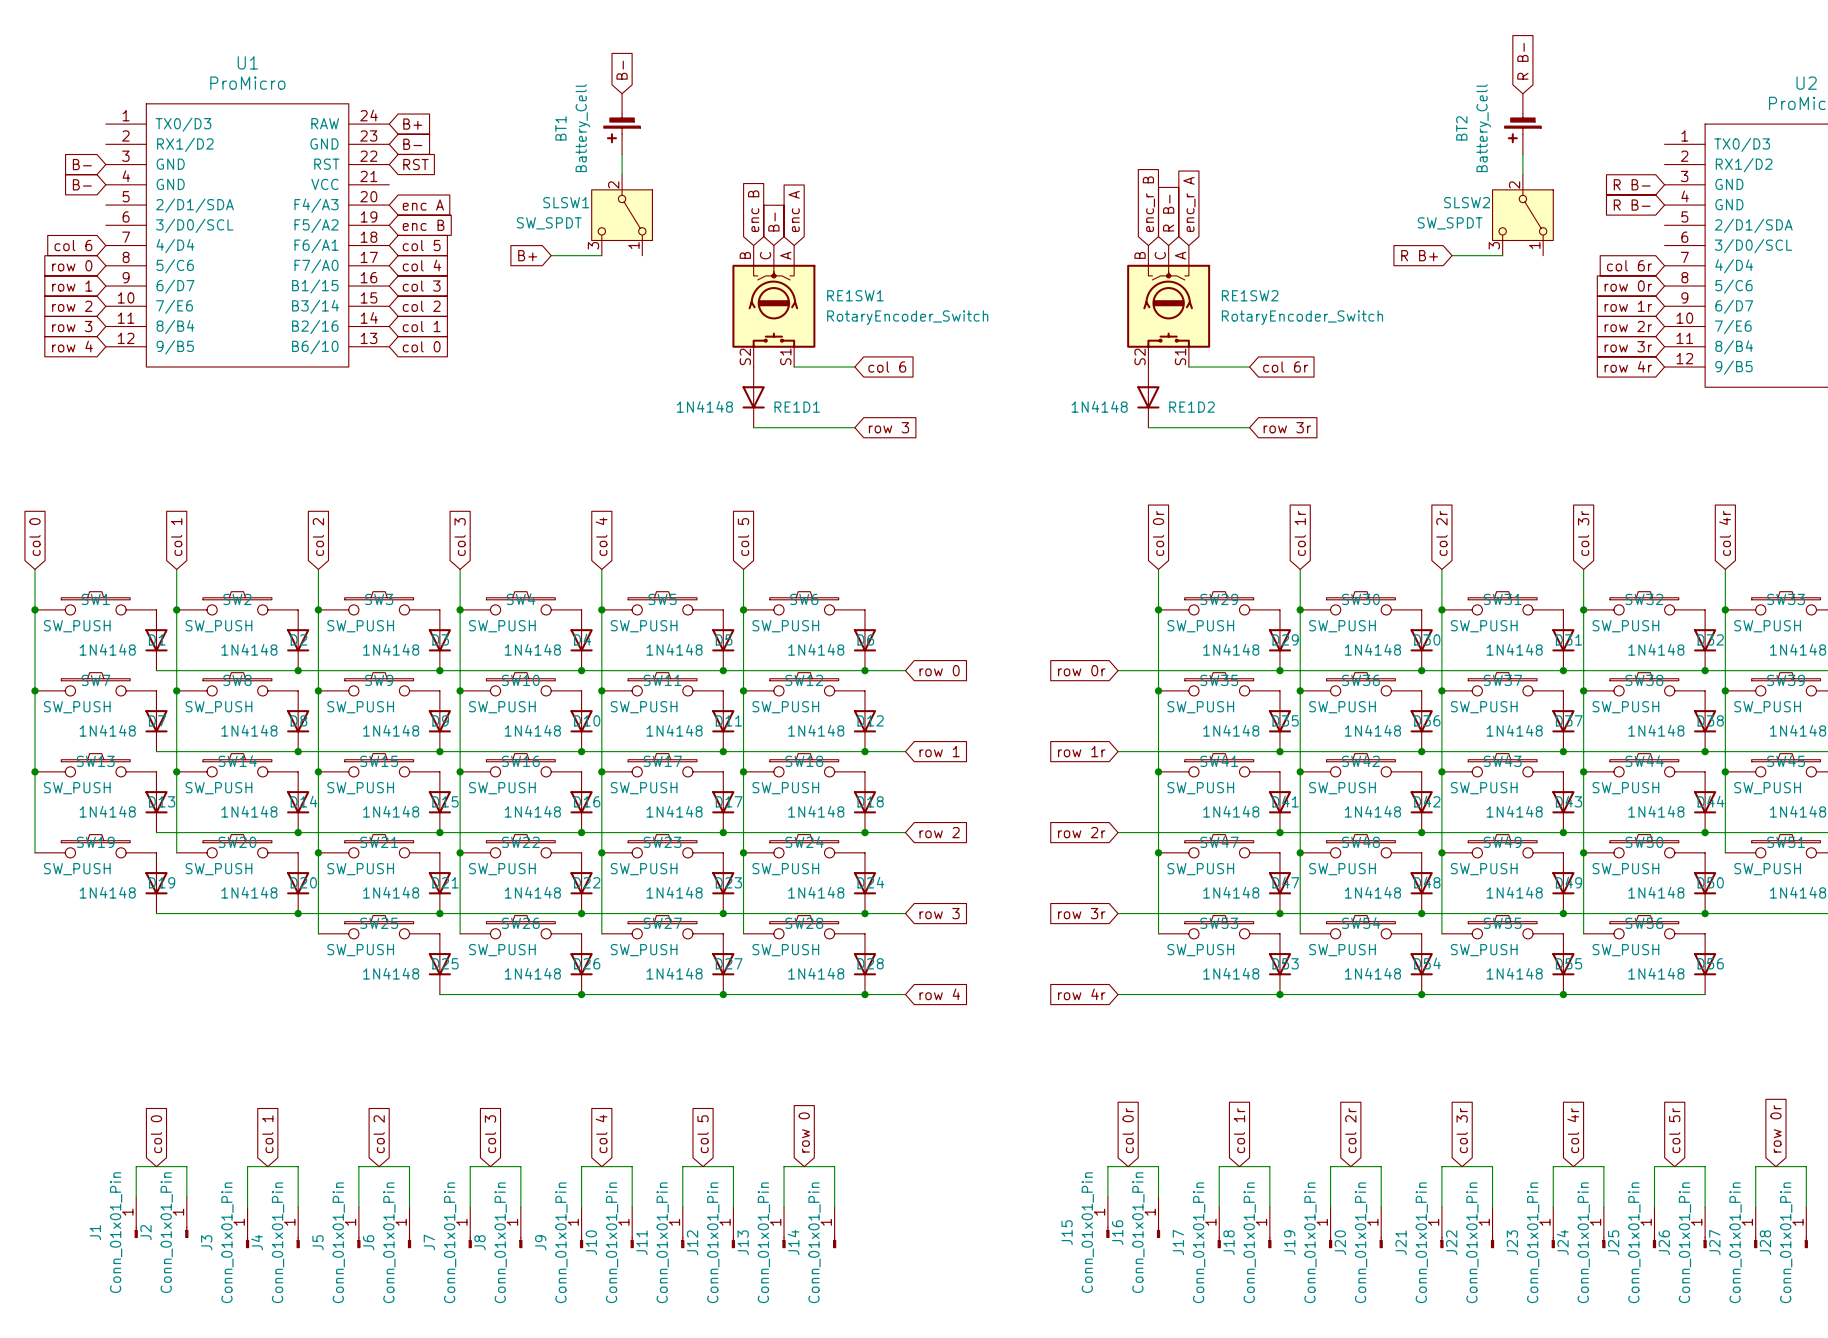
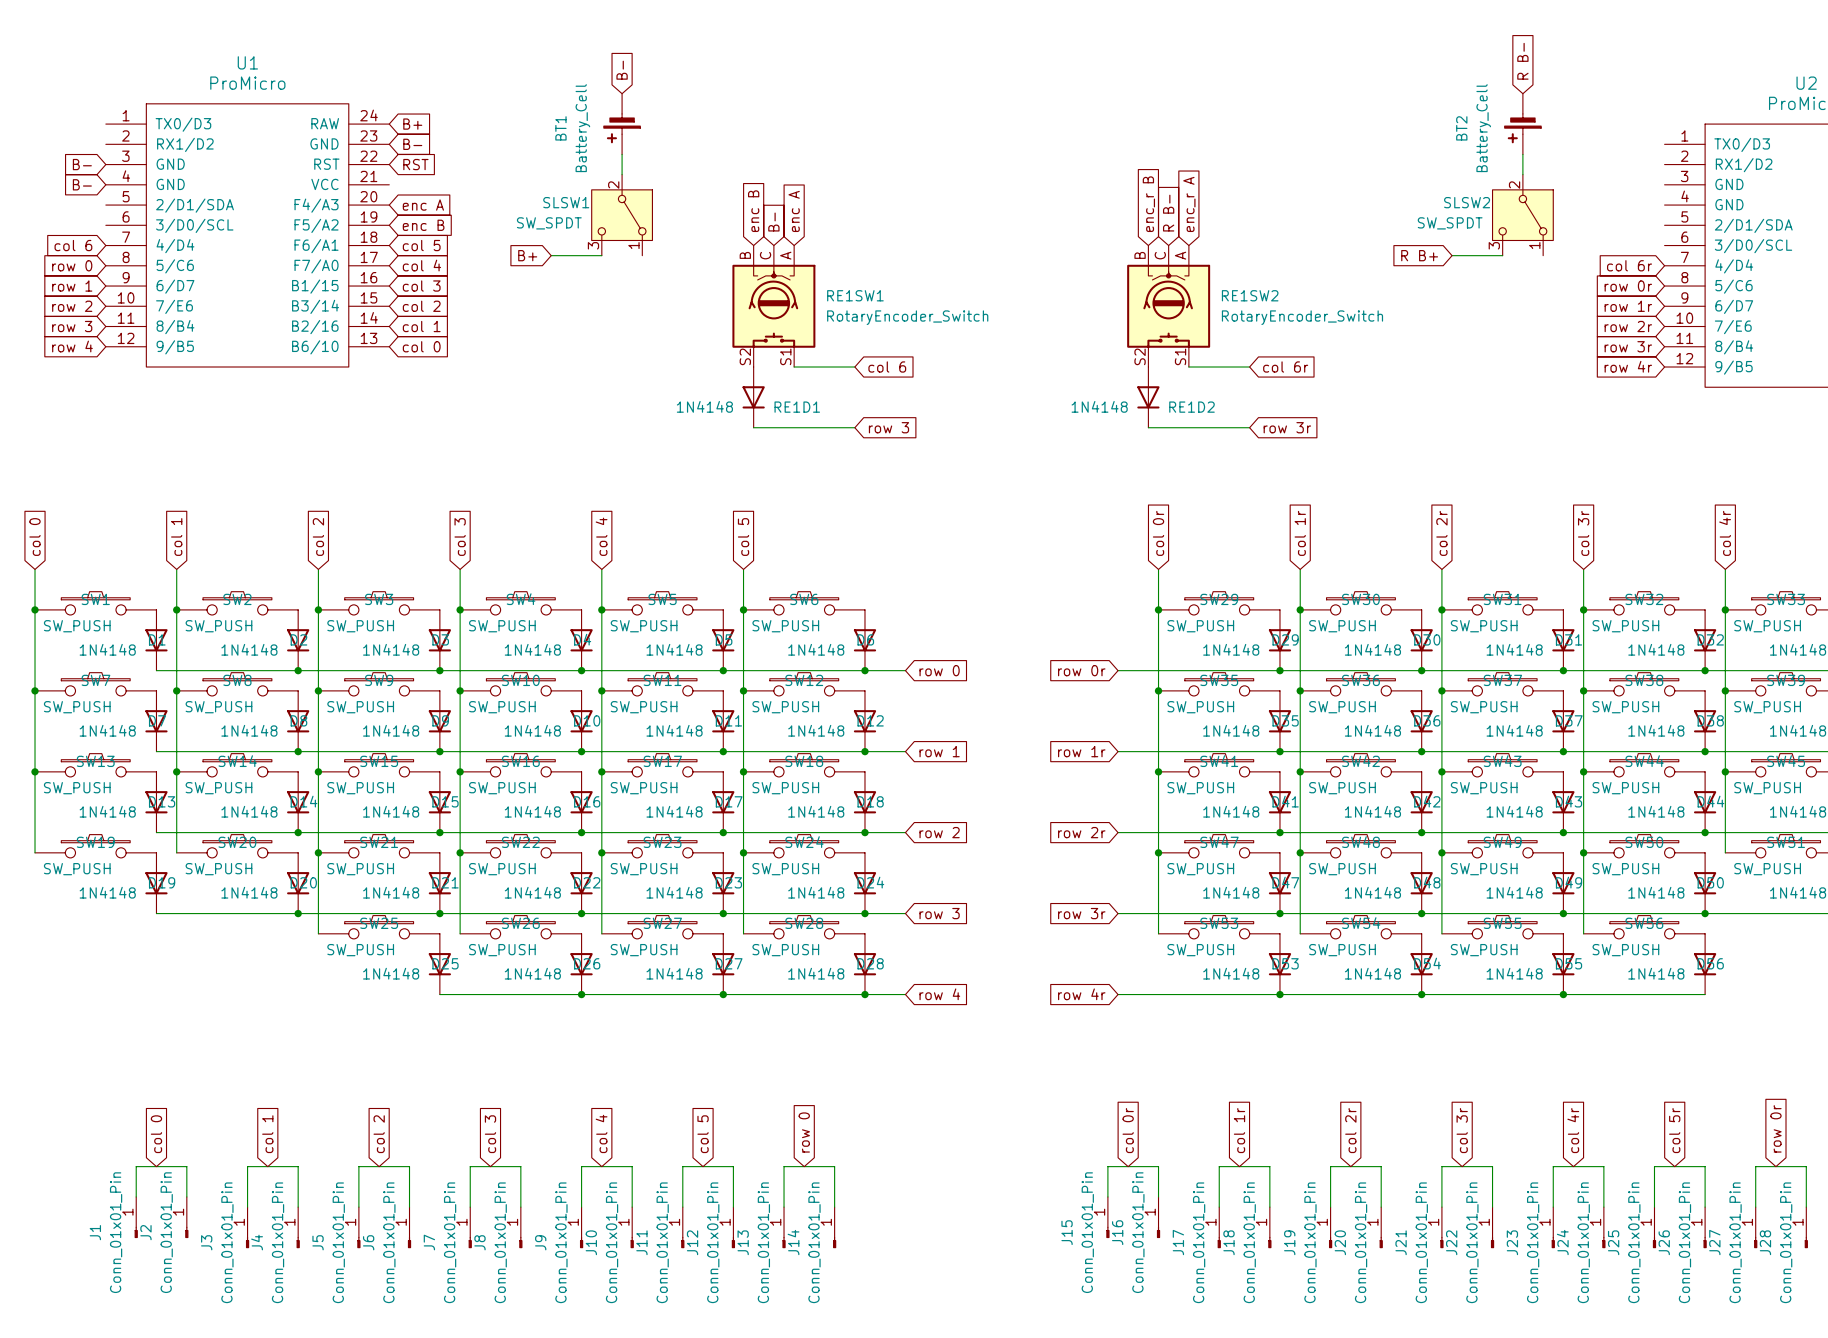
global label: R B- (1632, 184) -> none
global label: R B- (1632, 205) -> none

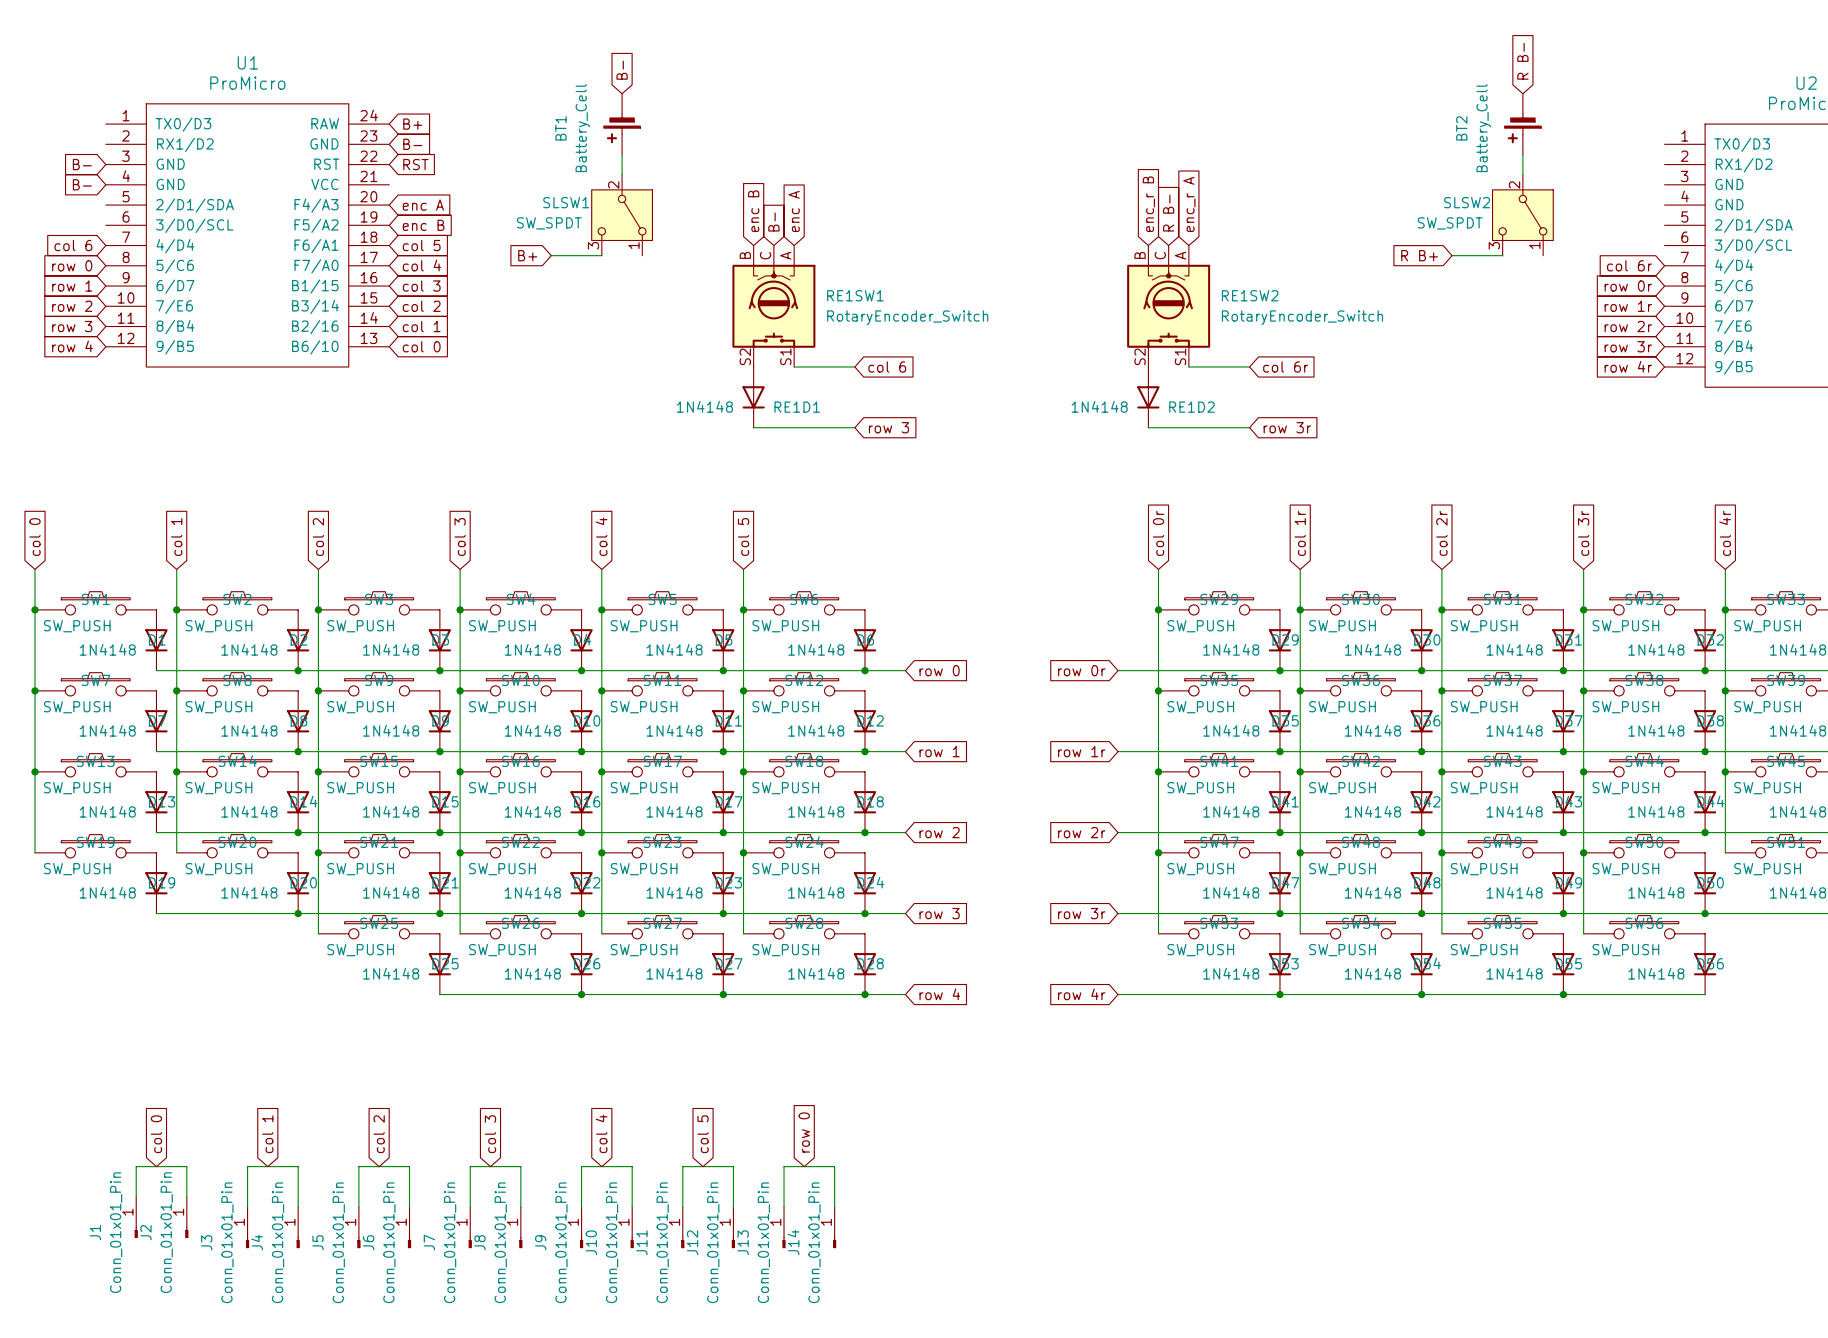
global label: row 0r (1775, 1128) -> none
global label: col 0r (1128, 1130) -> none
global label: col 1r (1239, 1130) -> none
global label: col 2r (1350, 1130) -> none
global label: col 3r (1462, 1130) -> none
global label: col 4r (1573, 1130) -> none
global label: col 5r (1674, 1130) -> none
wire: (1107, 1196) (1107, 1166) (1158, 1166) (1158, 1196) -> none
wire: (1219, 1207) (1219, 1166) (1269, 1166) (1269, 1207) -> none
wire: (1330, 1207) (1330, 1166) (1381, 1166) (1381, 1207) -> none
wire: (1441, 1207) (1441, 1166) (1492, 1166) (1492, 1207) -> none
wire: (1553, 1207) (1553, 1166) (1603, 1166) (1603, 1207) -> none
wire: (1654, 1207) (1654, 1166) (1705, 1166) (1705, 1207) -> none
wire: (1755, 1207) (1755, 1166) (1806, 1166) (1806, 1207) -> none
J15: Conn_01x01_Pin (1107, 1217) -> none
J16: Conn_01x01_Pin (1158, 1217) -> none
J17: Conn_01x01_Pin (1219, 1227) -> none
J18: Conn_01x01_Pin (1269, 1227) -> none
J19: Conn_01x01_Pin (1330, 1227) -> none
J20: Conn_01x01_Pin (1381, 1227) -> none
J21: Conn_01x01_Pin (1441, 1227) -> none
J22: Conn_01x01_Pin (1492, 1227) -> none
J23: Conn_01x01_Pin (1553, 1227) -> none
J24: Conn_01x01_Pin (1603, 1227) -> none
J25: Conn_01x01_Pin (1654, 1227) -> none
J26: Conn_01x01_Pin (1705, 1227) -> none
J27: Conn_01x01_Pin (1755, 1227) -> none
J28: Conn_01x01_Pin (1806, 1227) -> none

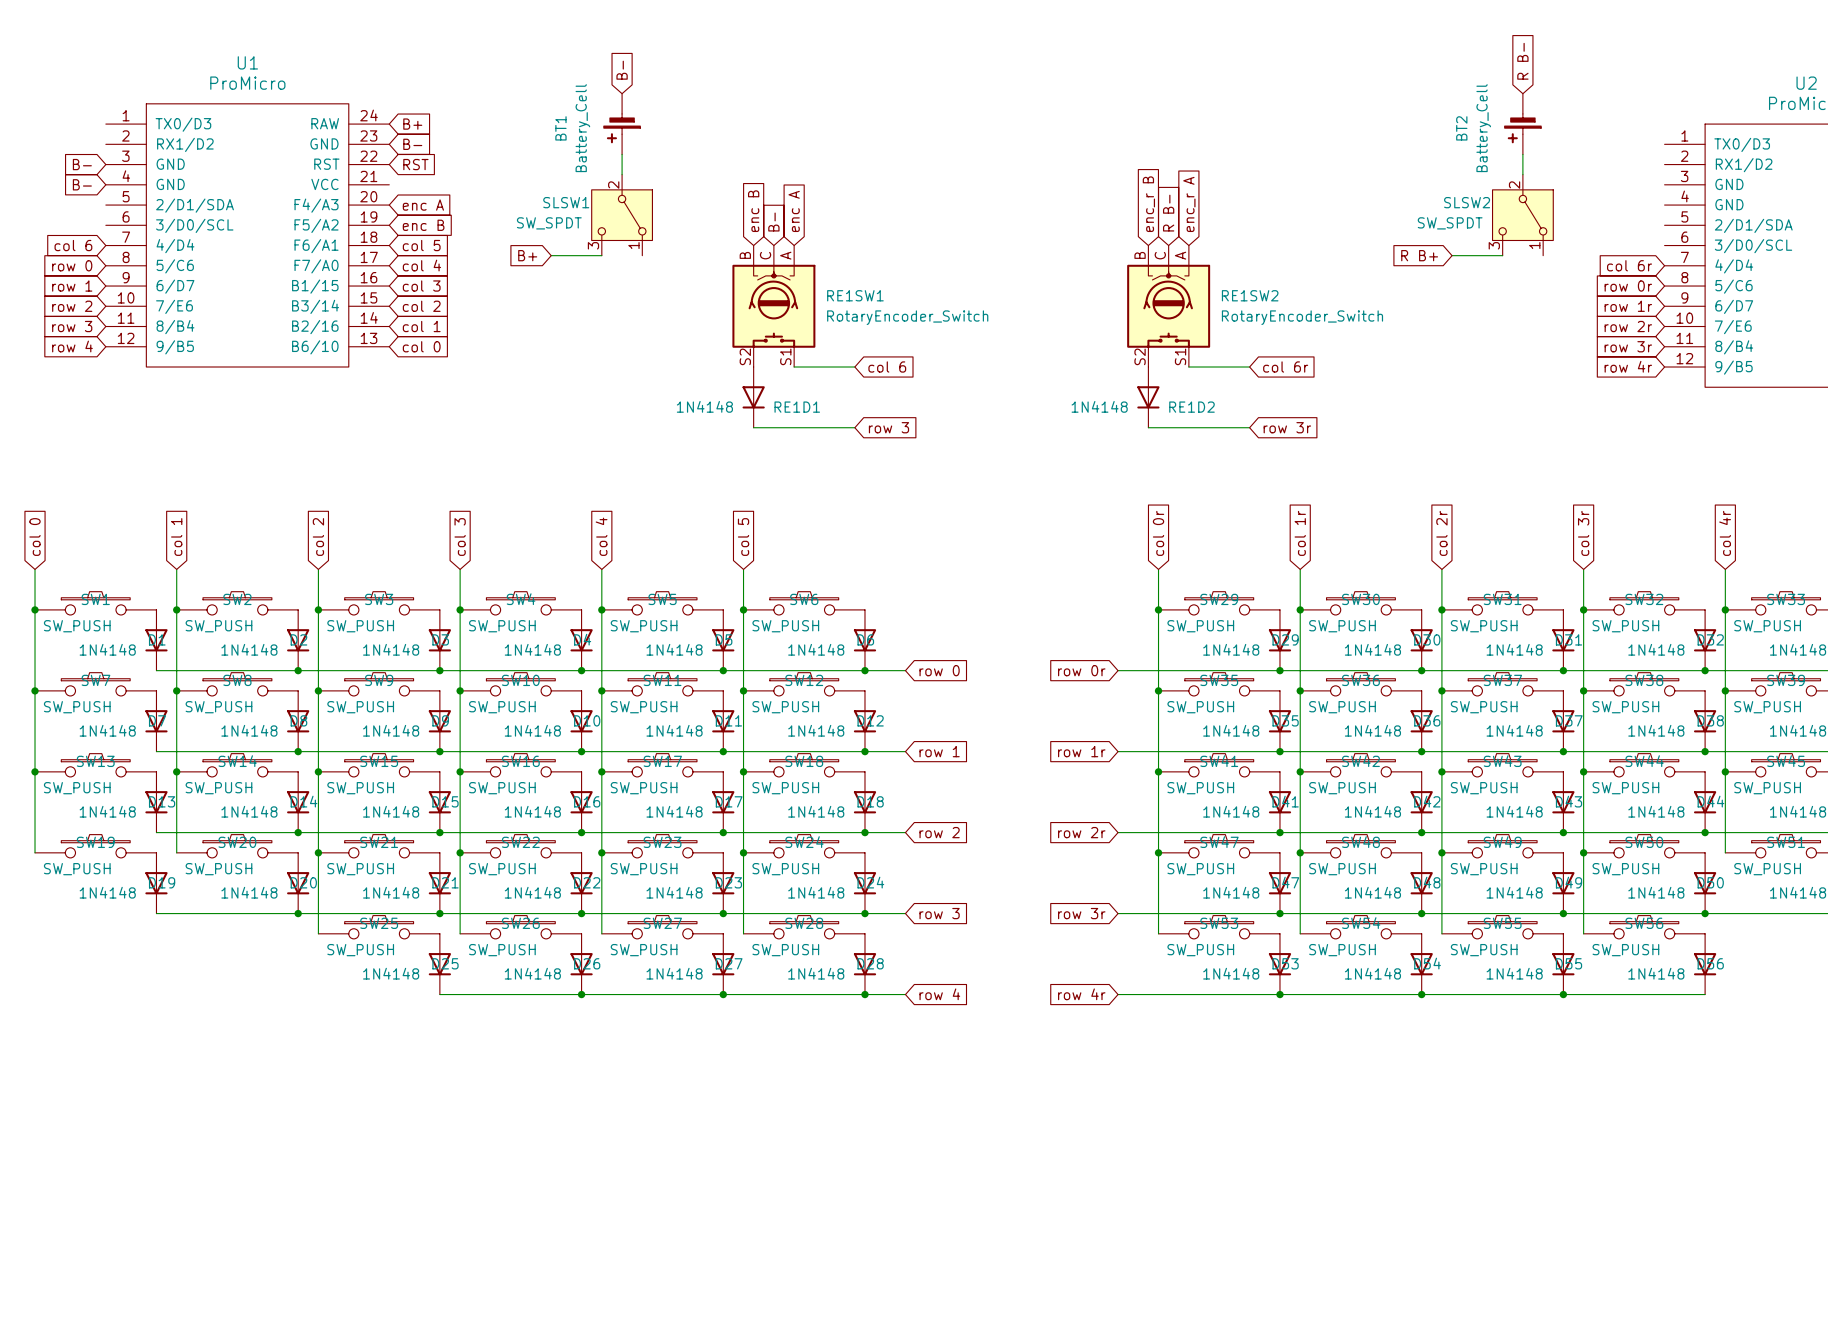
global label: row 0 (804, 1132) -> none
global label: col 4 (601, 1133) -> none
global label: col 0 (156, 1134) -> none
global label: col 1 (267, 1134) -> none
global label: col 2 (379, 1134) -> none
global label: col 3 (490, 1134) -> none
global label: col 5 (703, 1134) -> none
wire: (136, 1196) (136, 1166) (186, 1166) (186, 1196) -> none
wire: (247, 1207) (247, 1166) (298, 1166) (298, 1207) -> none
wire: (358, 1207) (358, 1166) (409, 1166) (409, 1207) -> none
wire: (470, 1207) (470, 1166) (520, 1166) (520, 1207) -> none
wire: (581, 1207) (581, 1166) (632, 1166) (632, 1207) -> none
wire: (682, 1207) (682, 1166) (733, 1166) (733, 1207) -> none
wire: (784, 1207) (784, 1166) (834, 1166) (834, 1207) -> none
J1: Conn_01x01_Pin (136, 1217) -> none
J2: Conn_01x01_Pin (186, 1217) -> none
J3: Conn_01x01_Pin (247, 1227) -> none
J4: Conn_01x01_Pin (298, 1227) -> none
J5: Conn_01x01_Pin (358, 1227) -> none
J6: Conn_01x01_Pin (409, 1227) -> none
J7: Conn_01x01_Pin (470, 1227) -> none
J8: Conn_01x01_Pin (520, 1227) -> none
J9: Conn_01x01_Pin (581, 1227) -> none
J10: Conn_01x01_Pin (632, 1227) -> none
J11: Conn_01x01_Pin (682, 1227) -> none
J12: Conn_01x01_Pin (733, 1227) -> none
J13: Conn_01x01_Pin (784, 1227) -> none
J14: Conn_01x01_Pin (834, 1227) -> none

